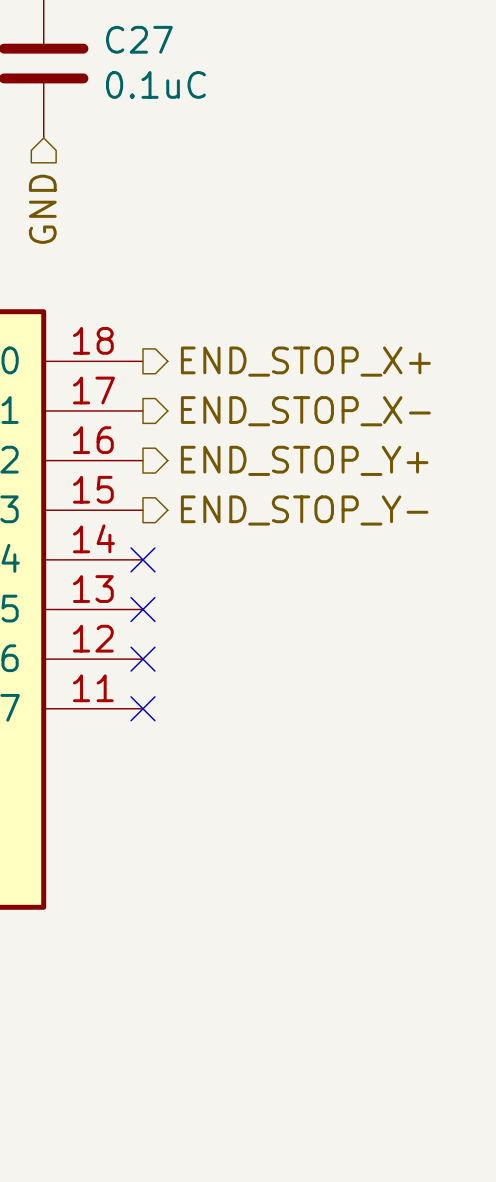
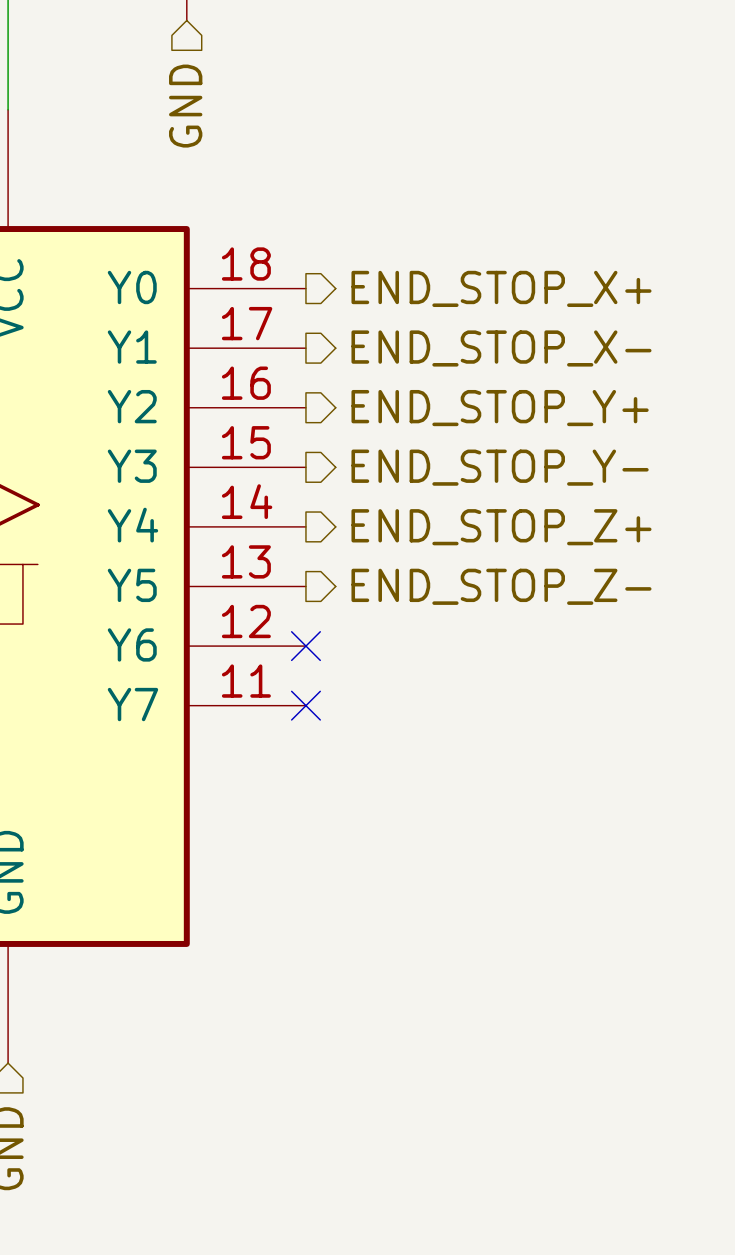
no-connect mark: (142, 559) -> none
hierarchical label: none -> END_STOP_Z+ (501, 527)
no-connect mark: (142, 609) -> none
hierarchical label: none -> END_STOP_Z- (501, 586)

